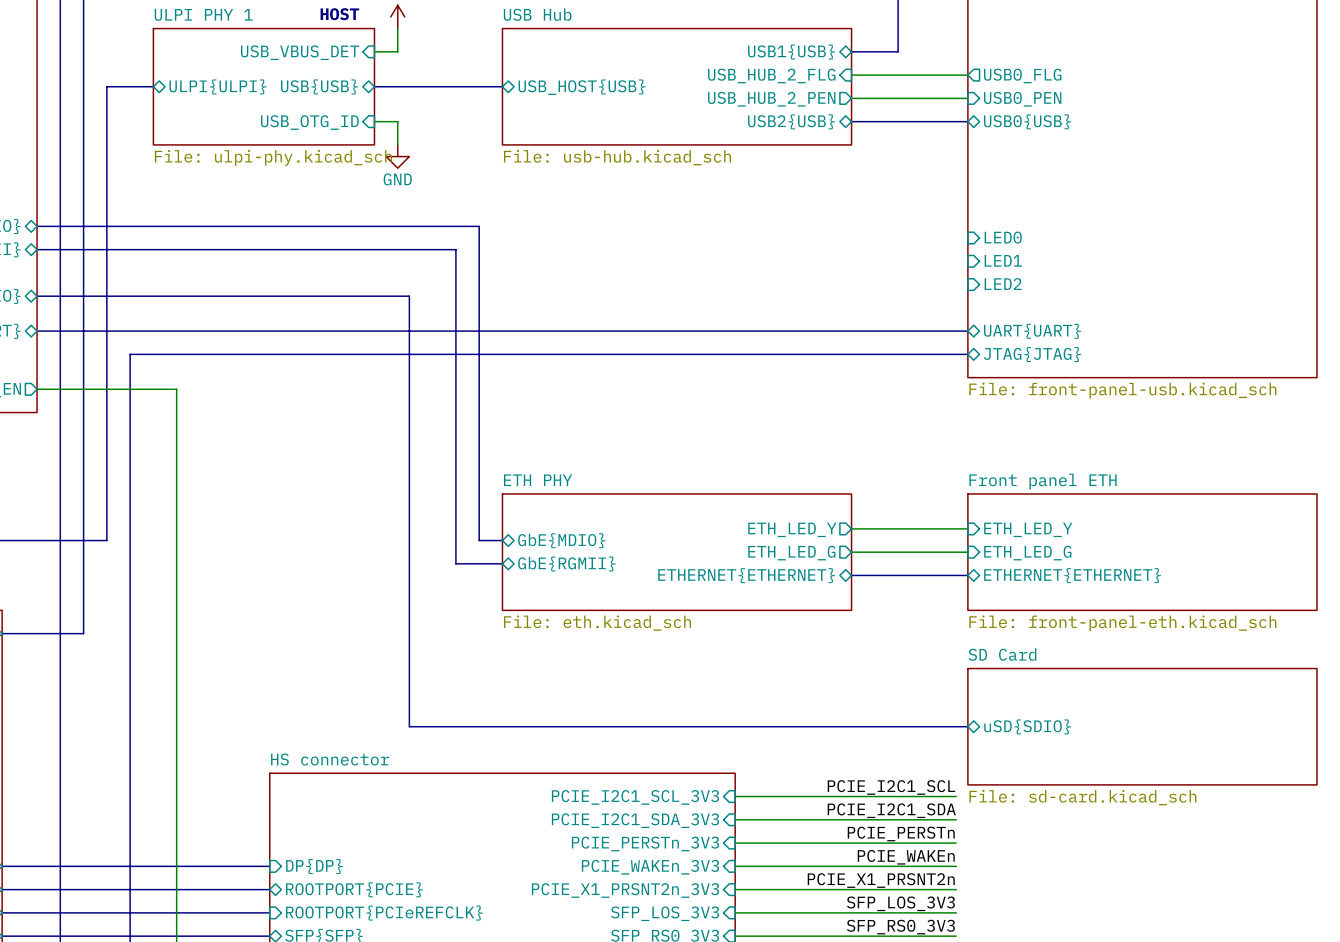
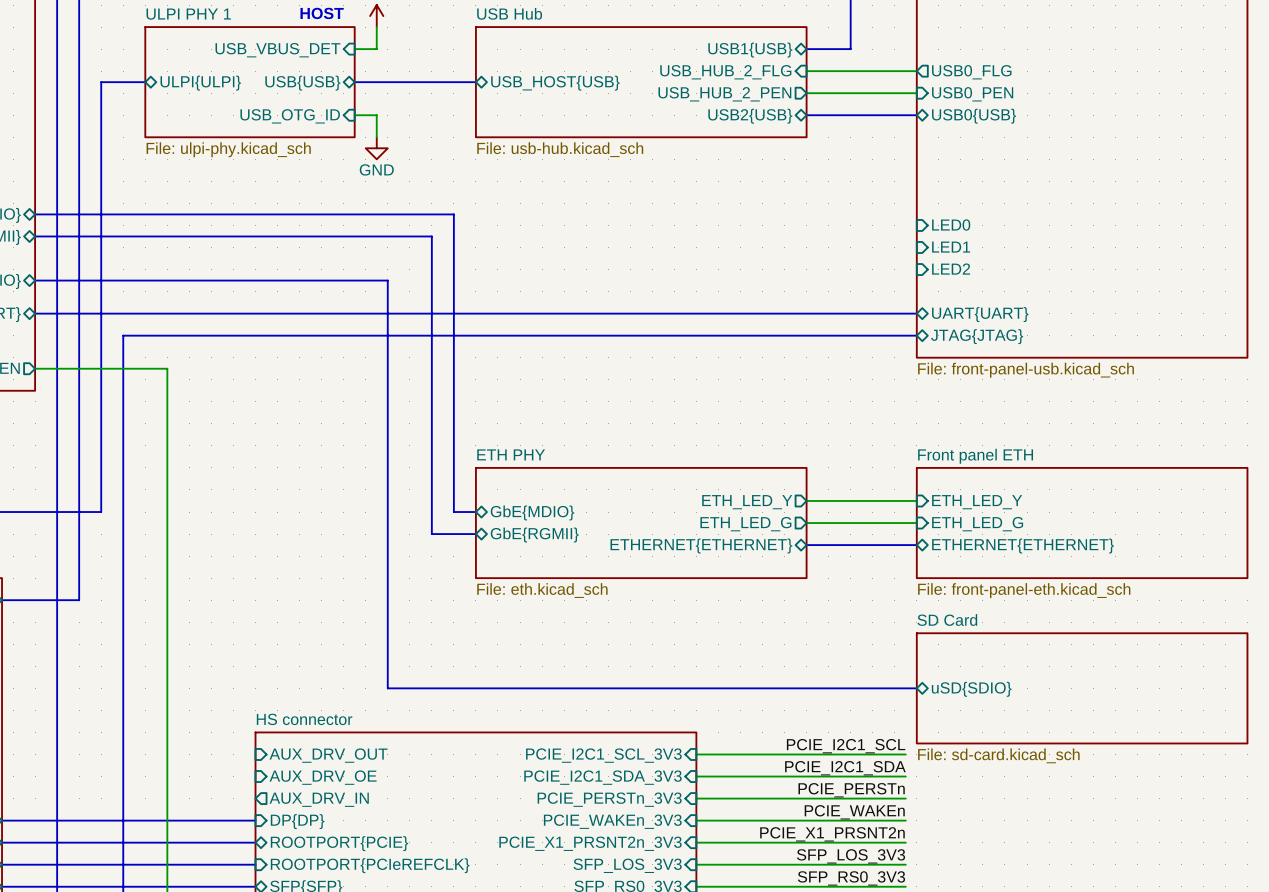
sheet pin: none -> AUX_DRV_OUT (328, 755)
sheet pin: none -> AUX_DRV_OE (323, 777)
sheet pin: none -> AUX_DRV_IN (319, 799)

